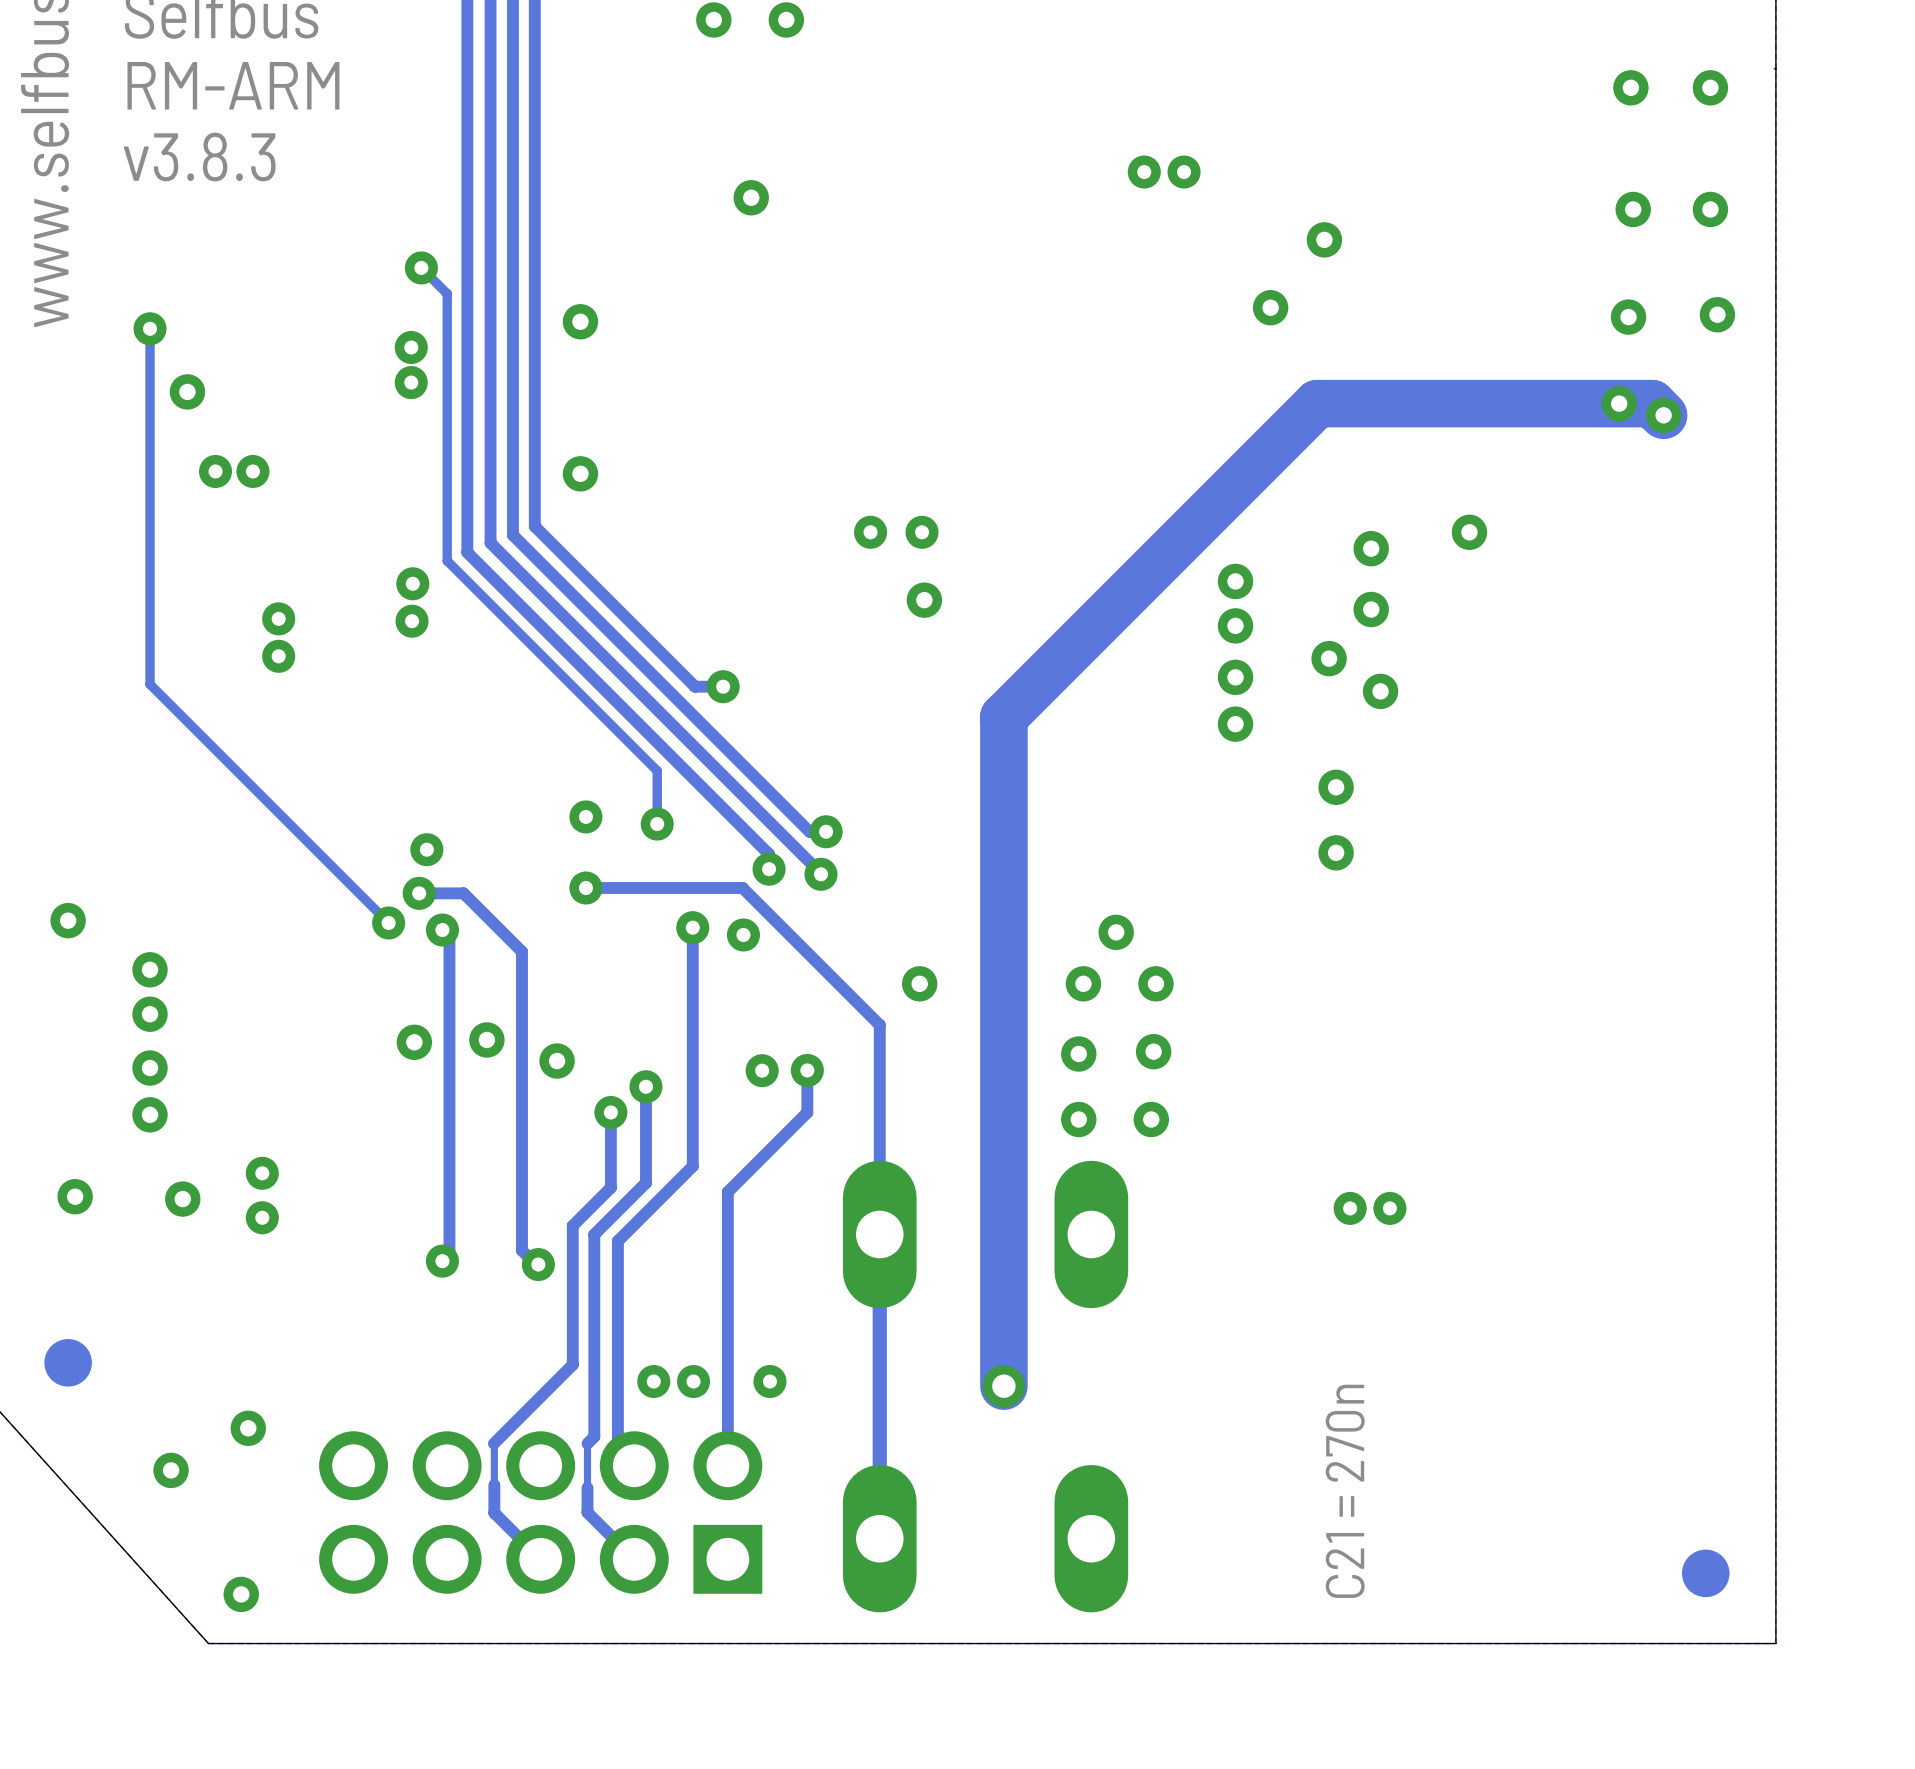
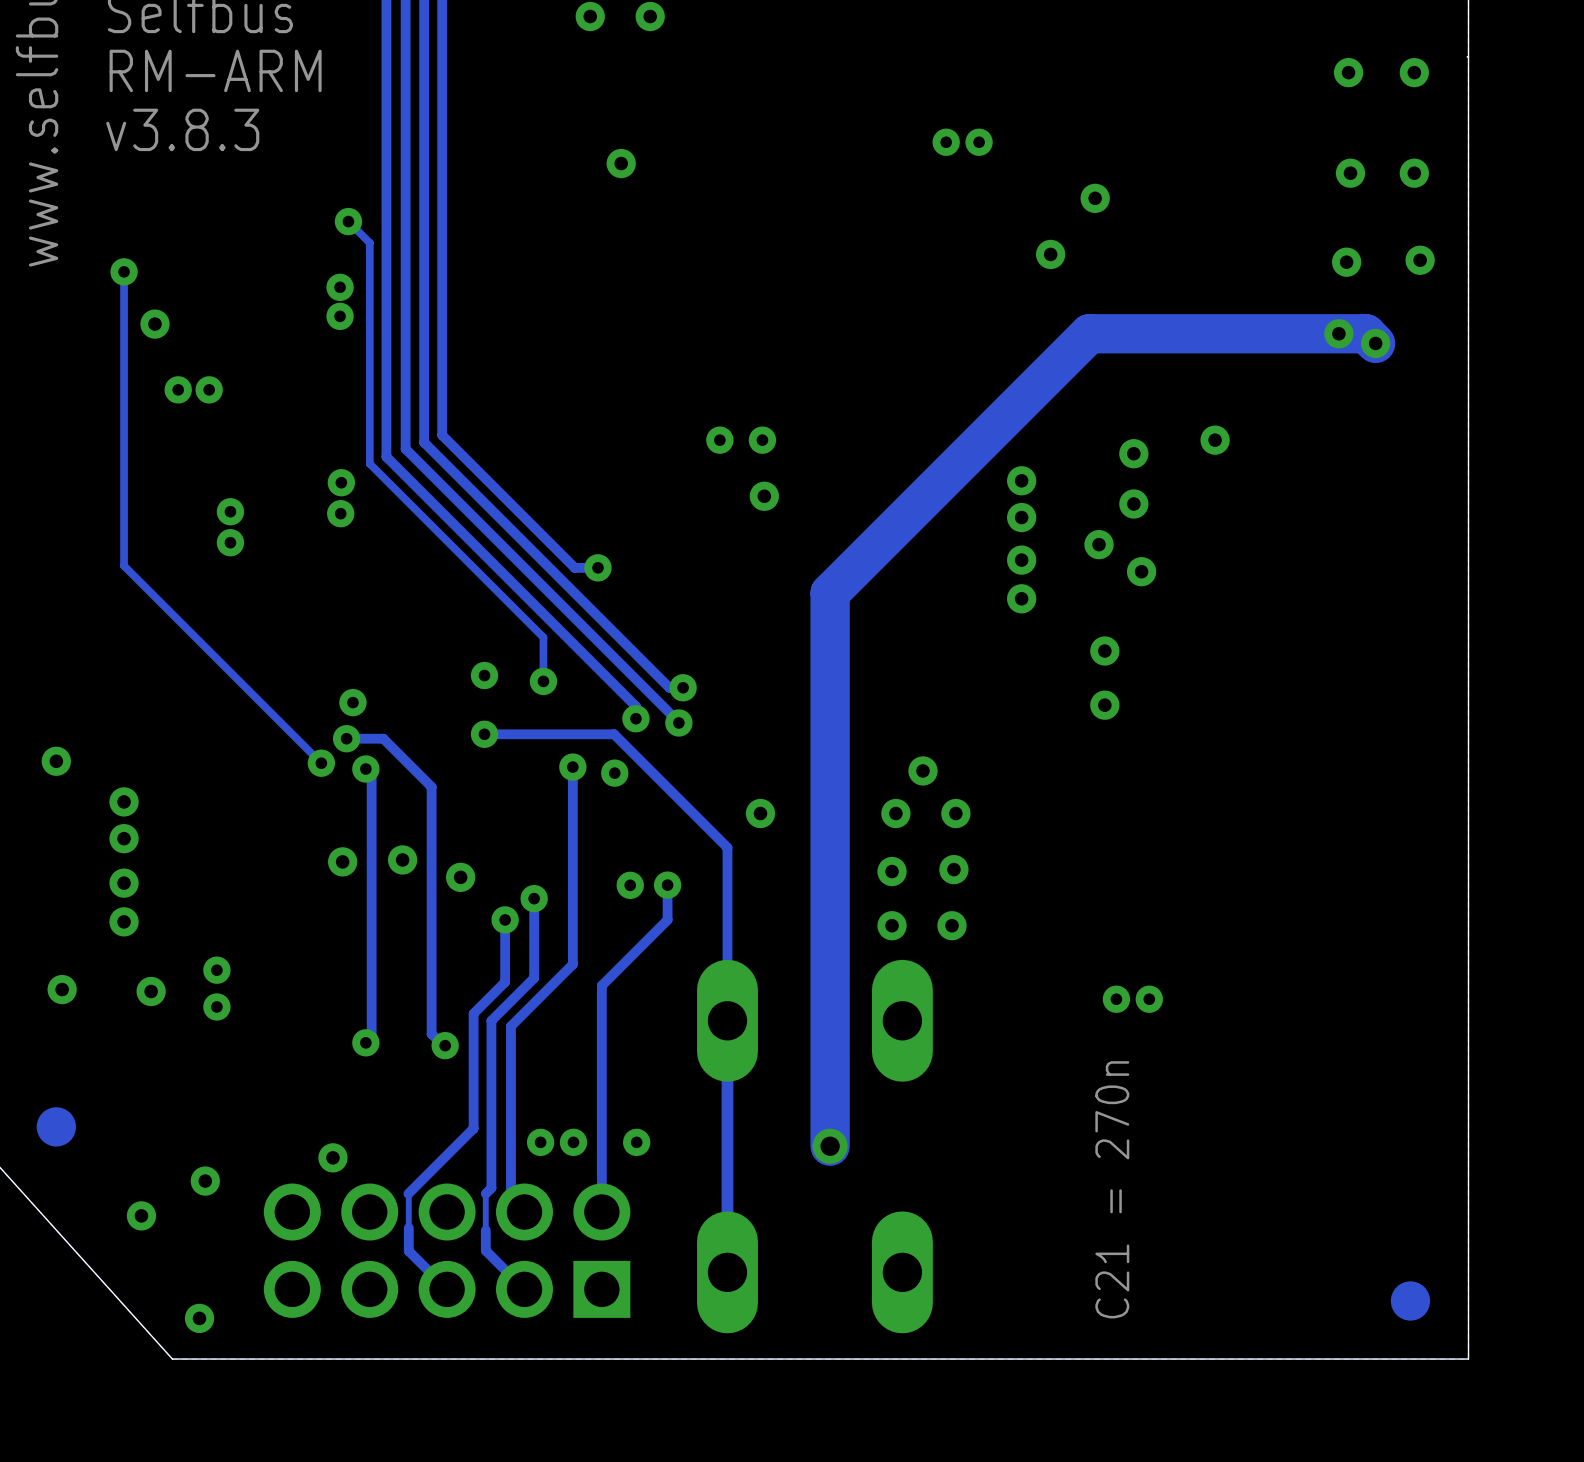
via: (580, 321) -> none
via: (580, 473) -> none
via: none -> (332, 1157)

